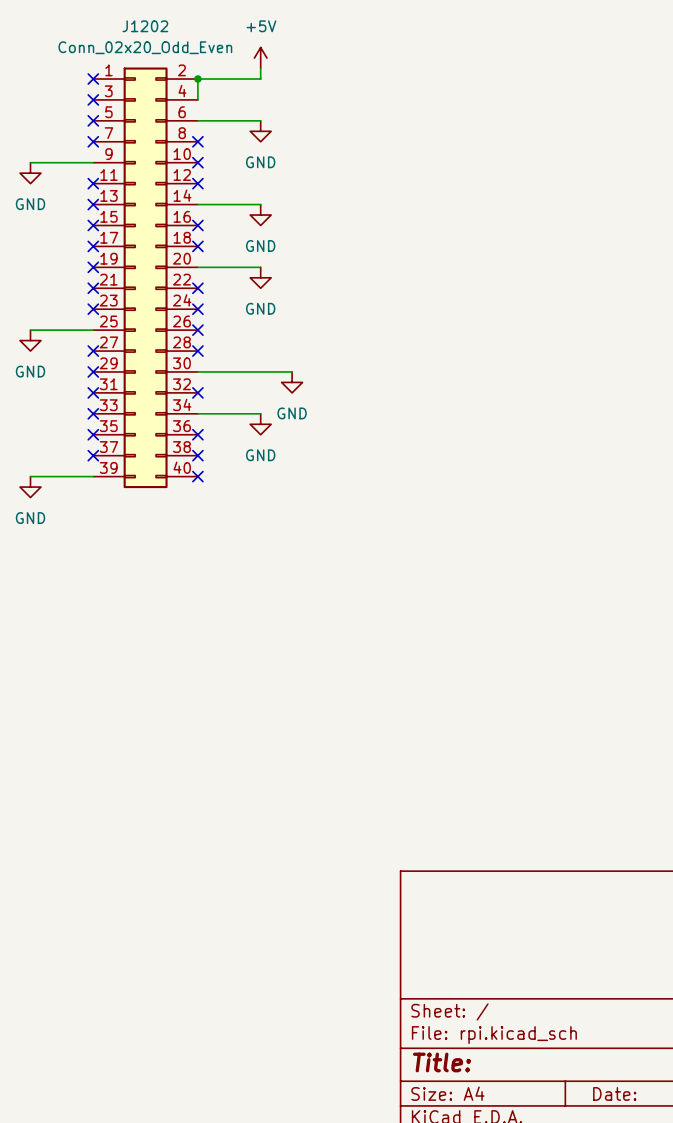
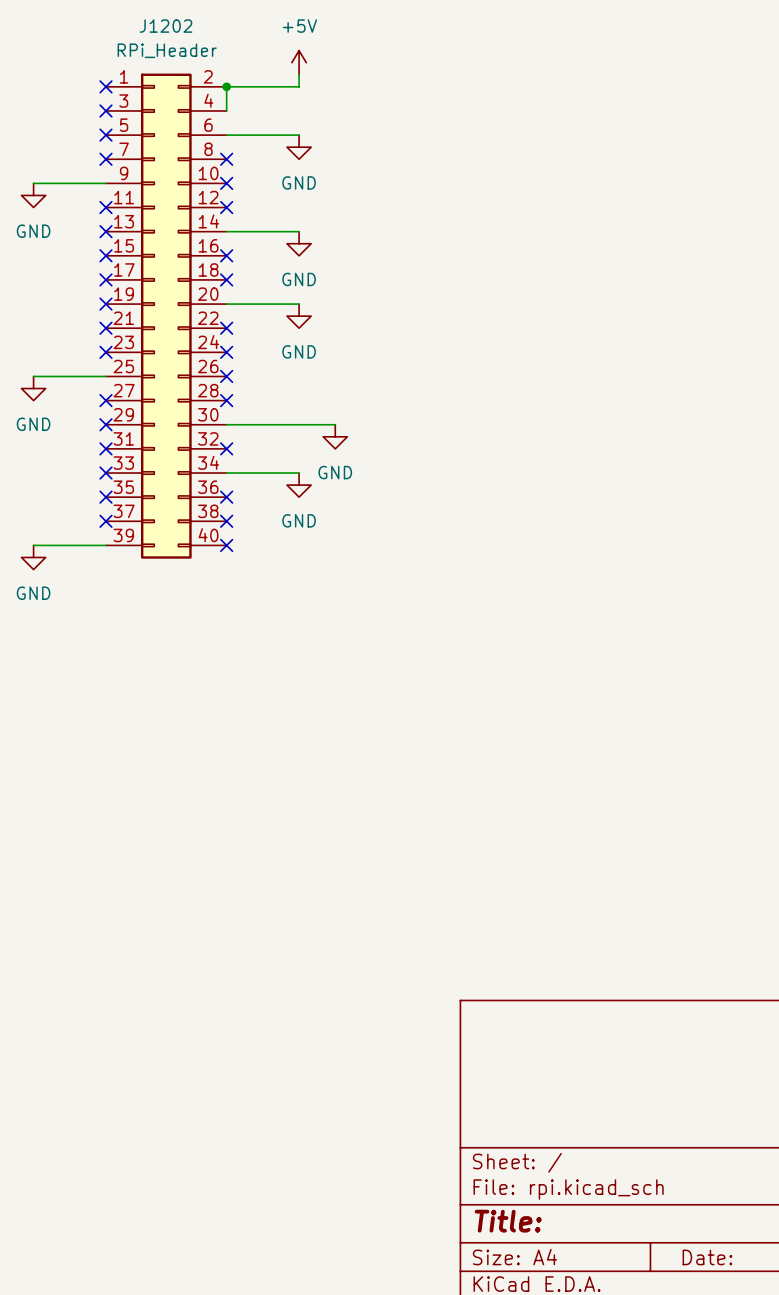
J1202 value: Conn_02x20_Odd_Even (145, 47) -> RPi_Header (167, 50)

